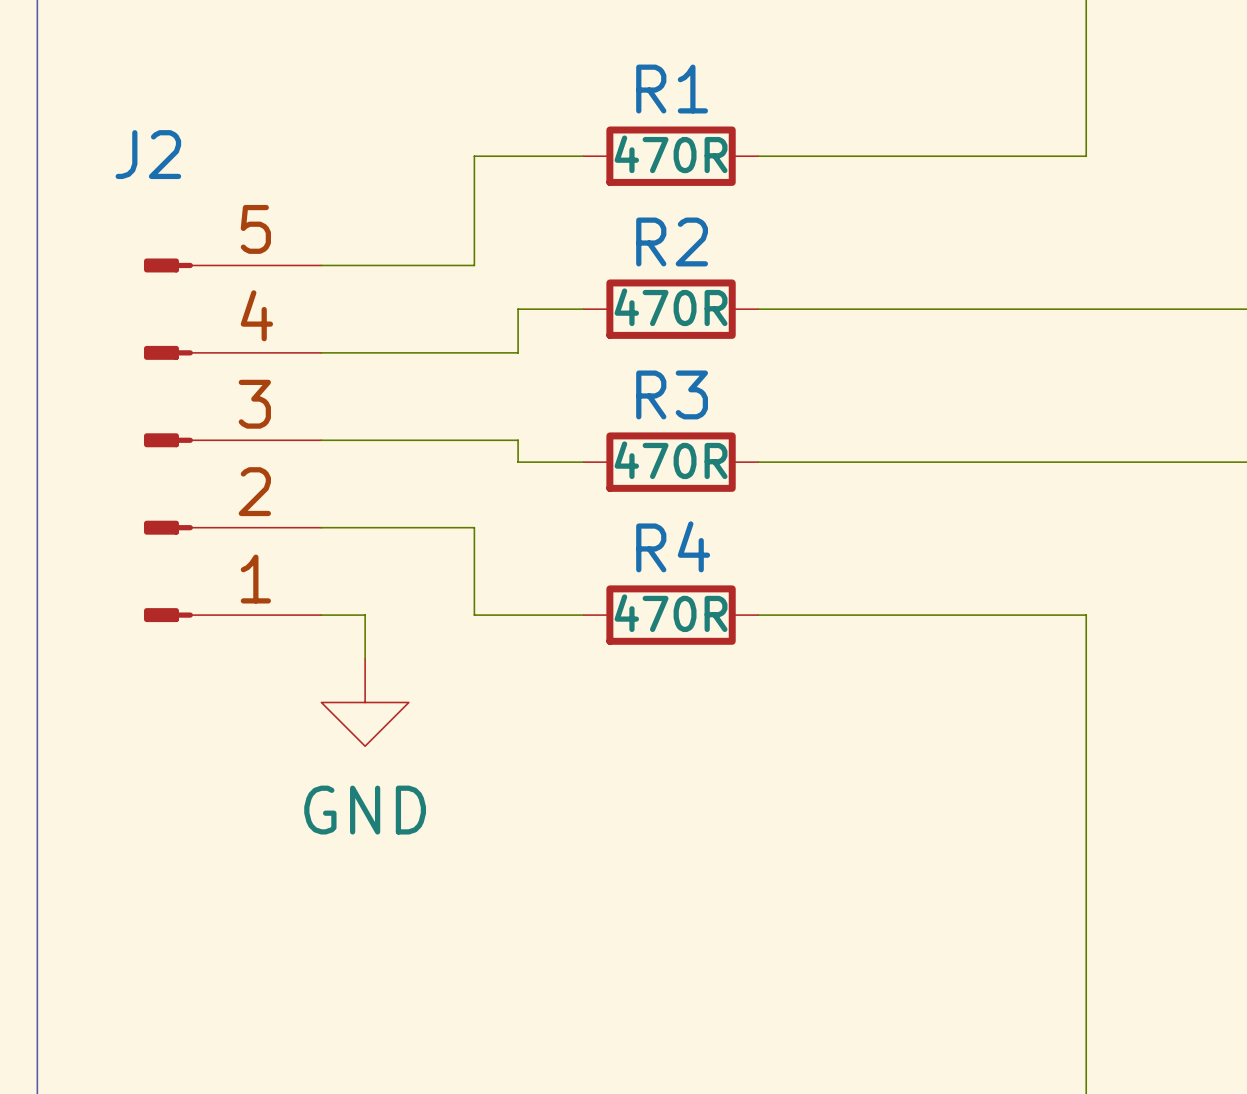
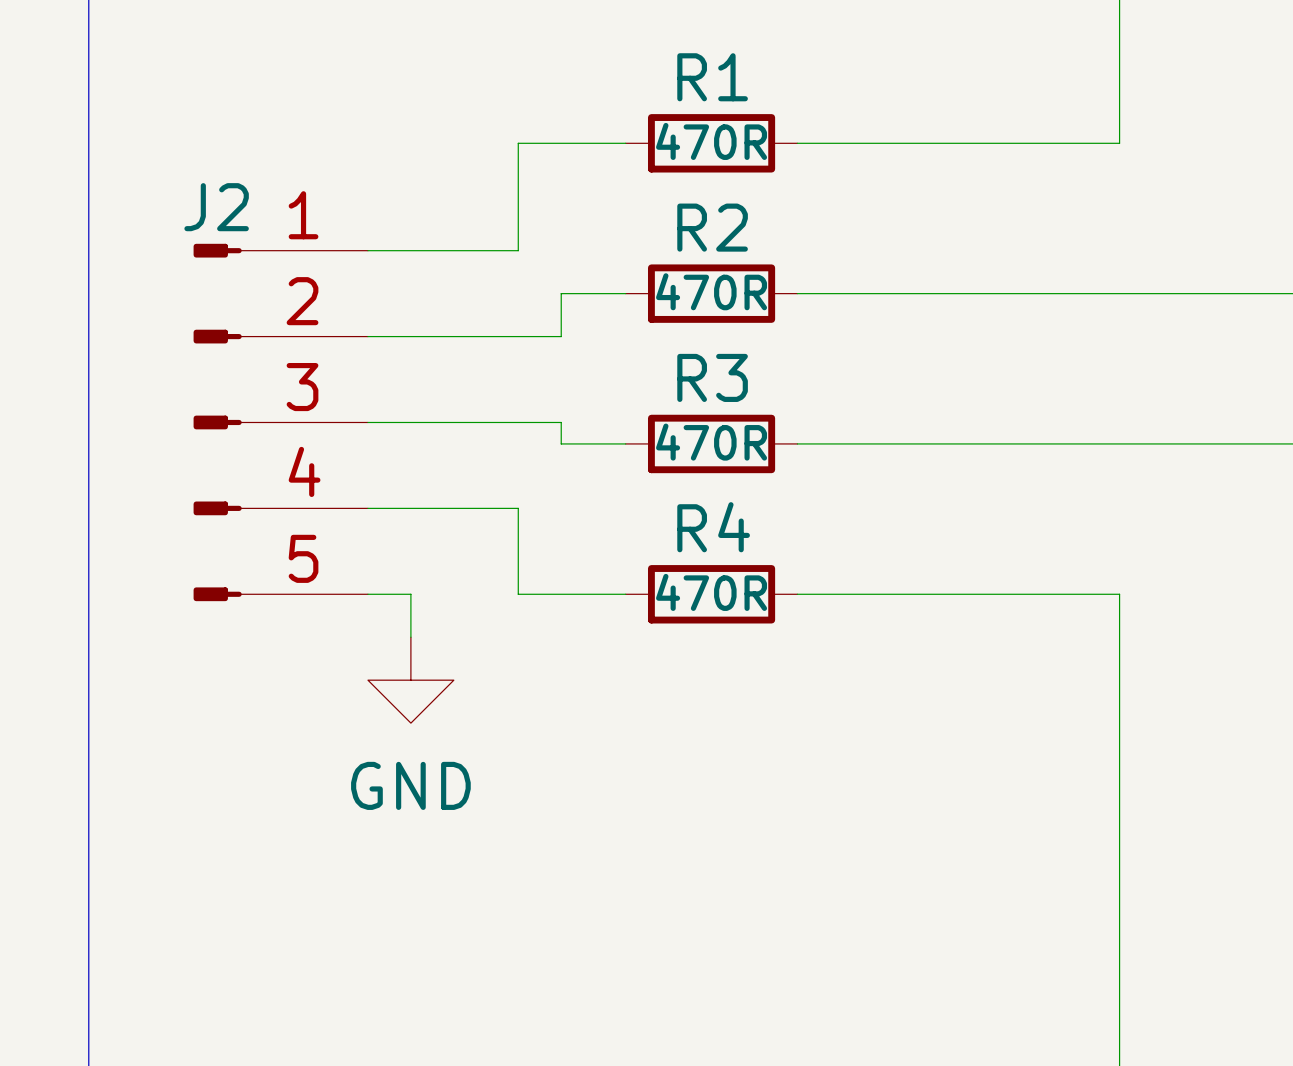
J2 name position: J2 (148, 154) -> J2 (216, 207)
J2 flip: as is (168, 440) -> up-down (217, 422)

